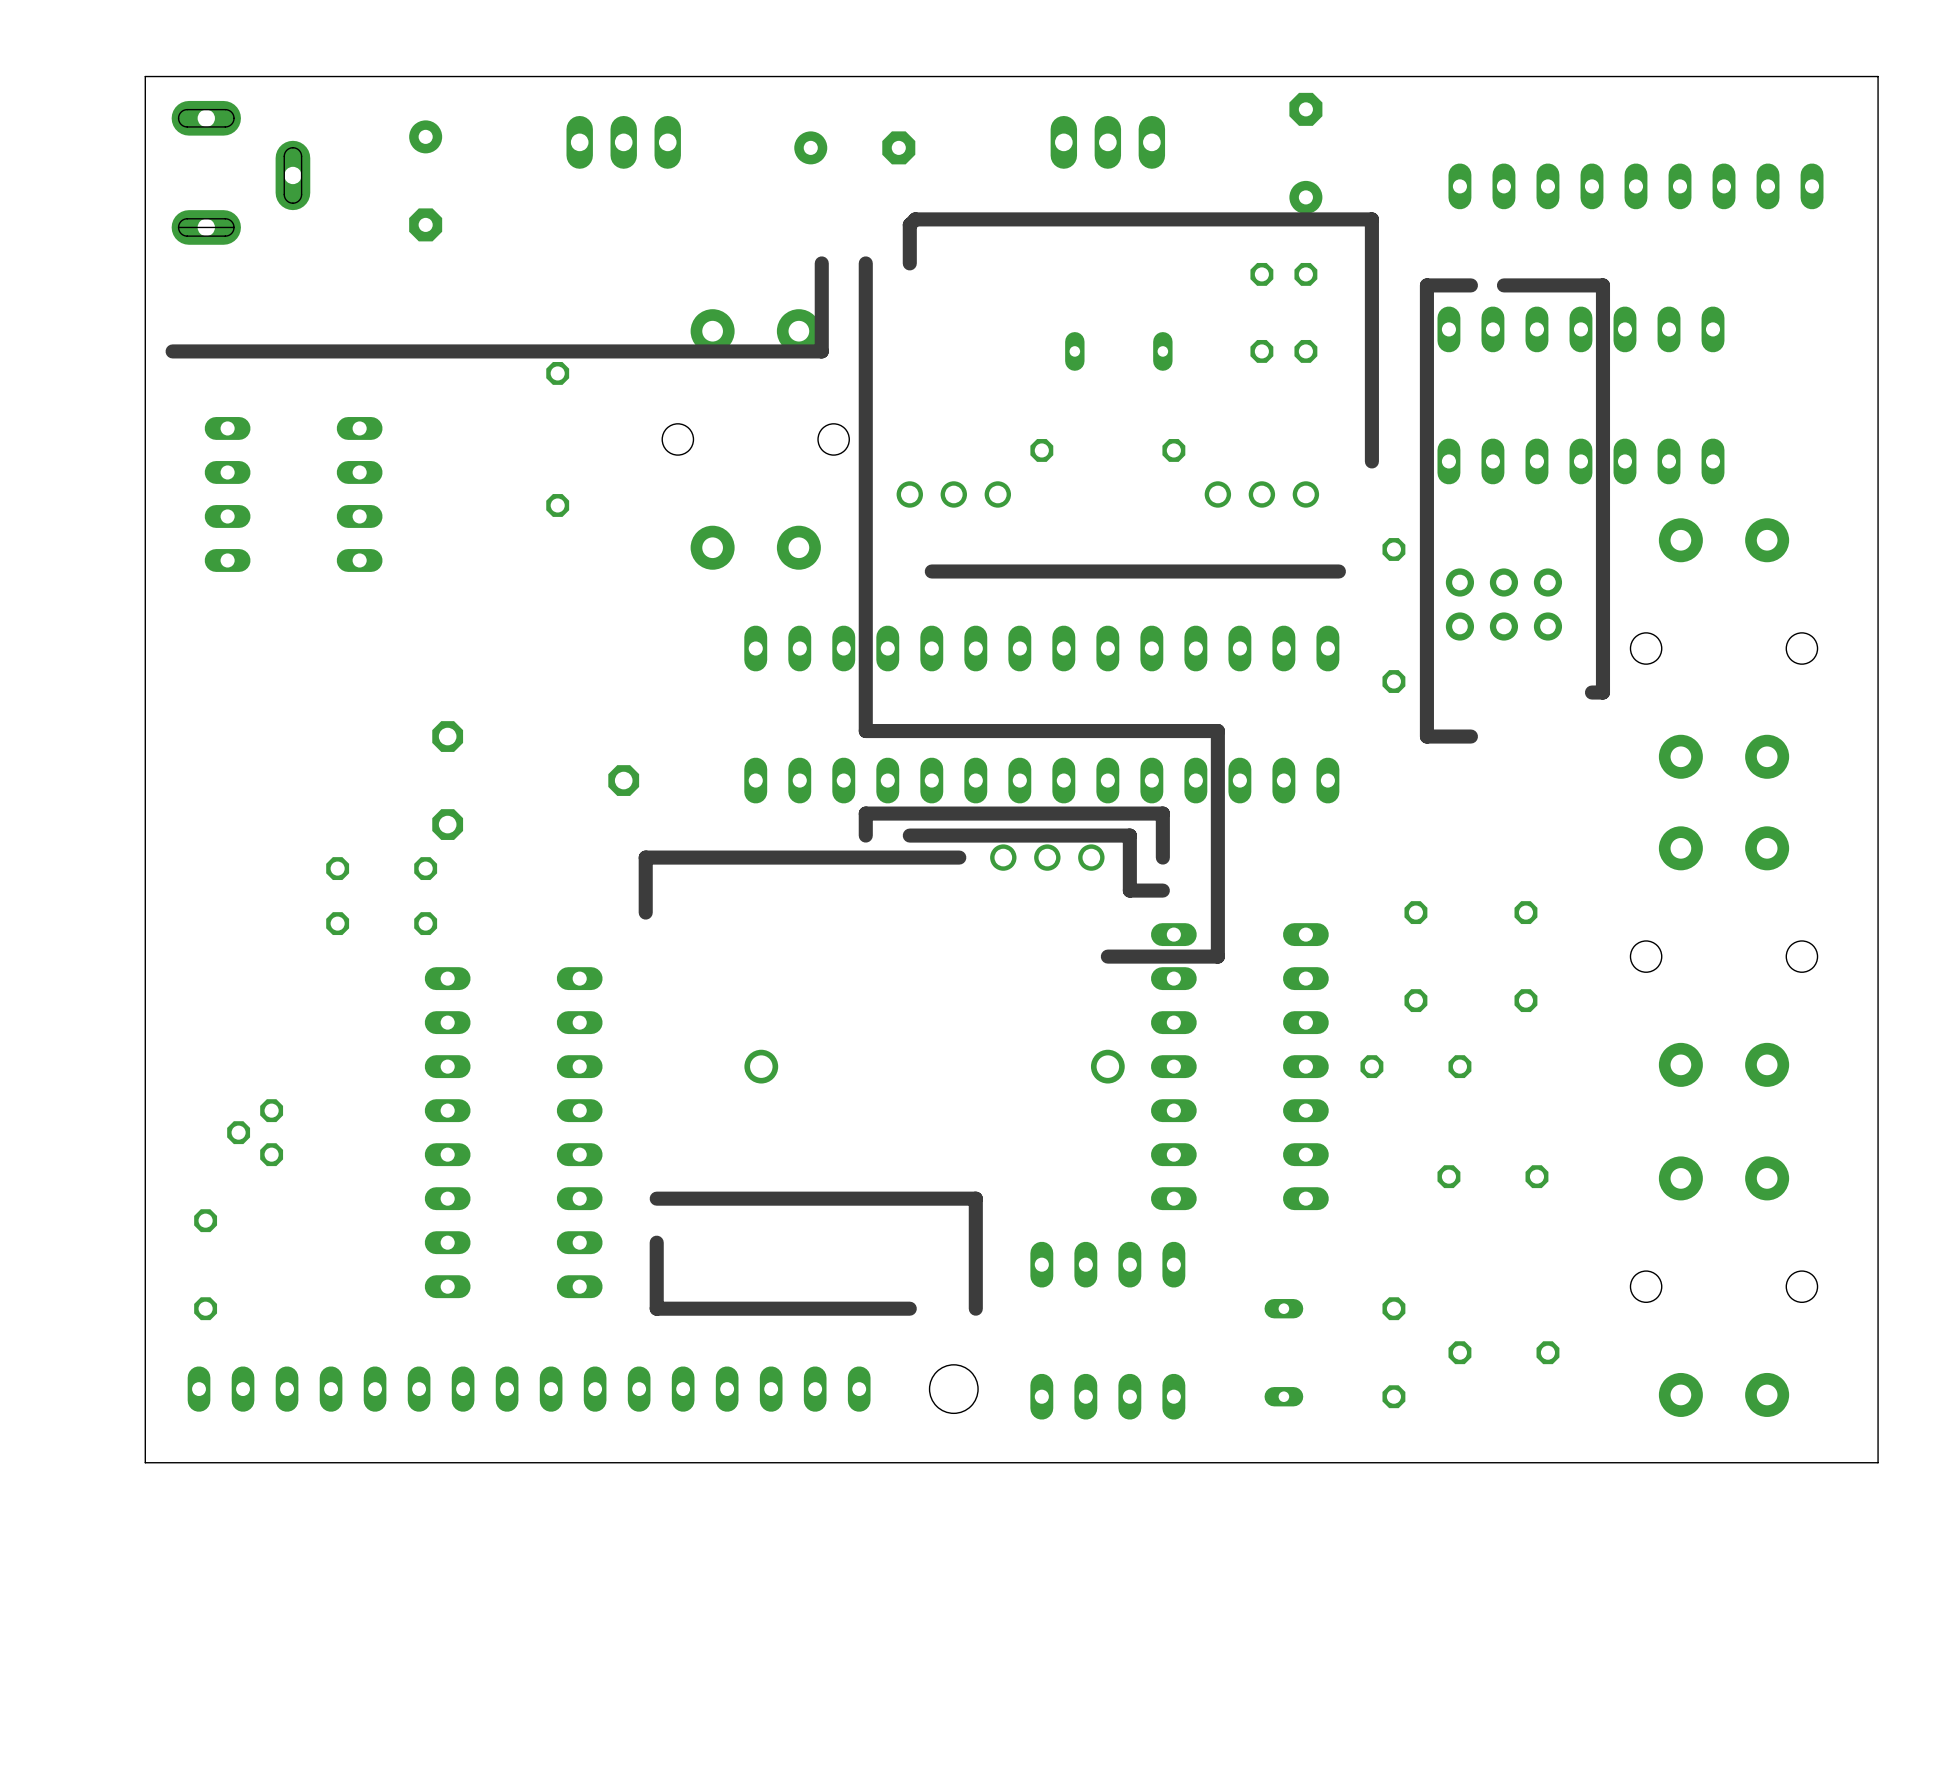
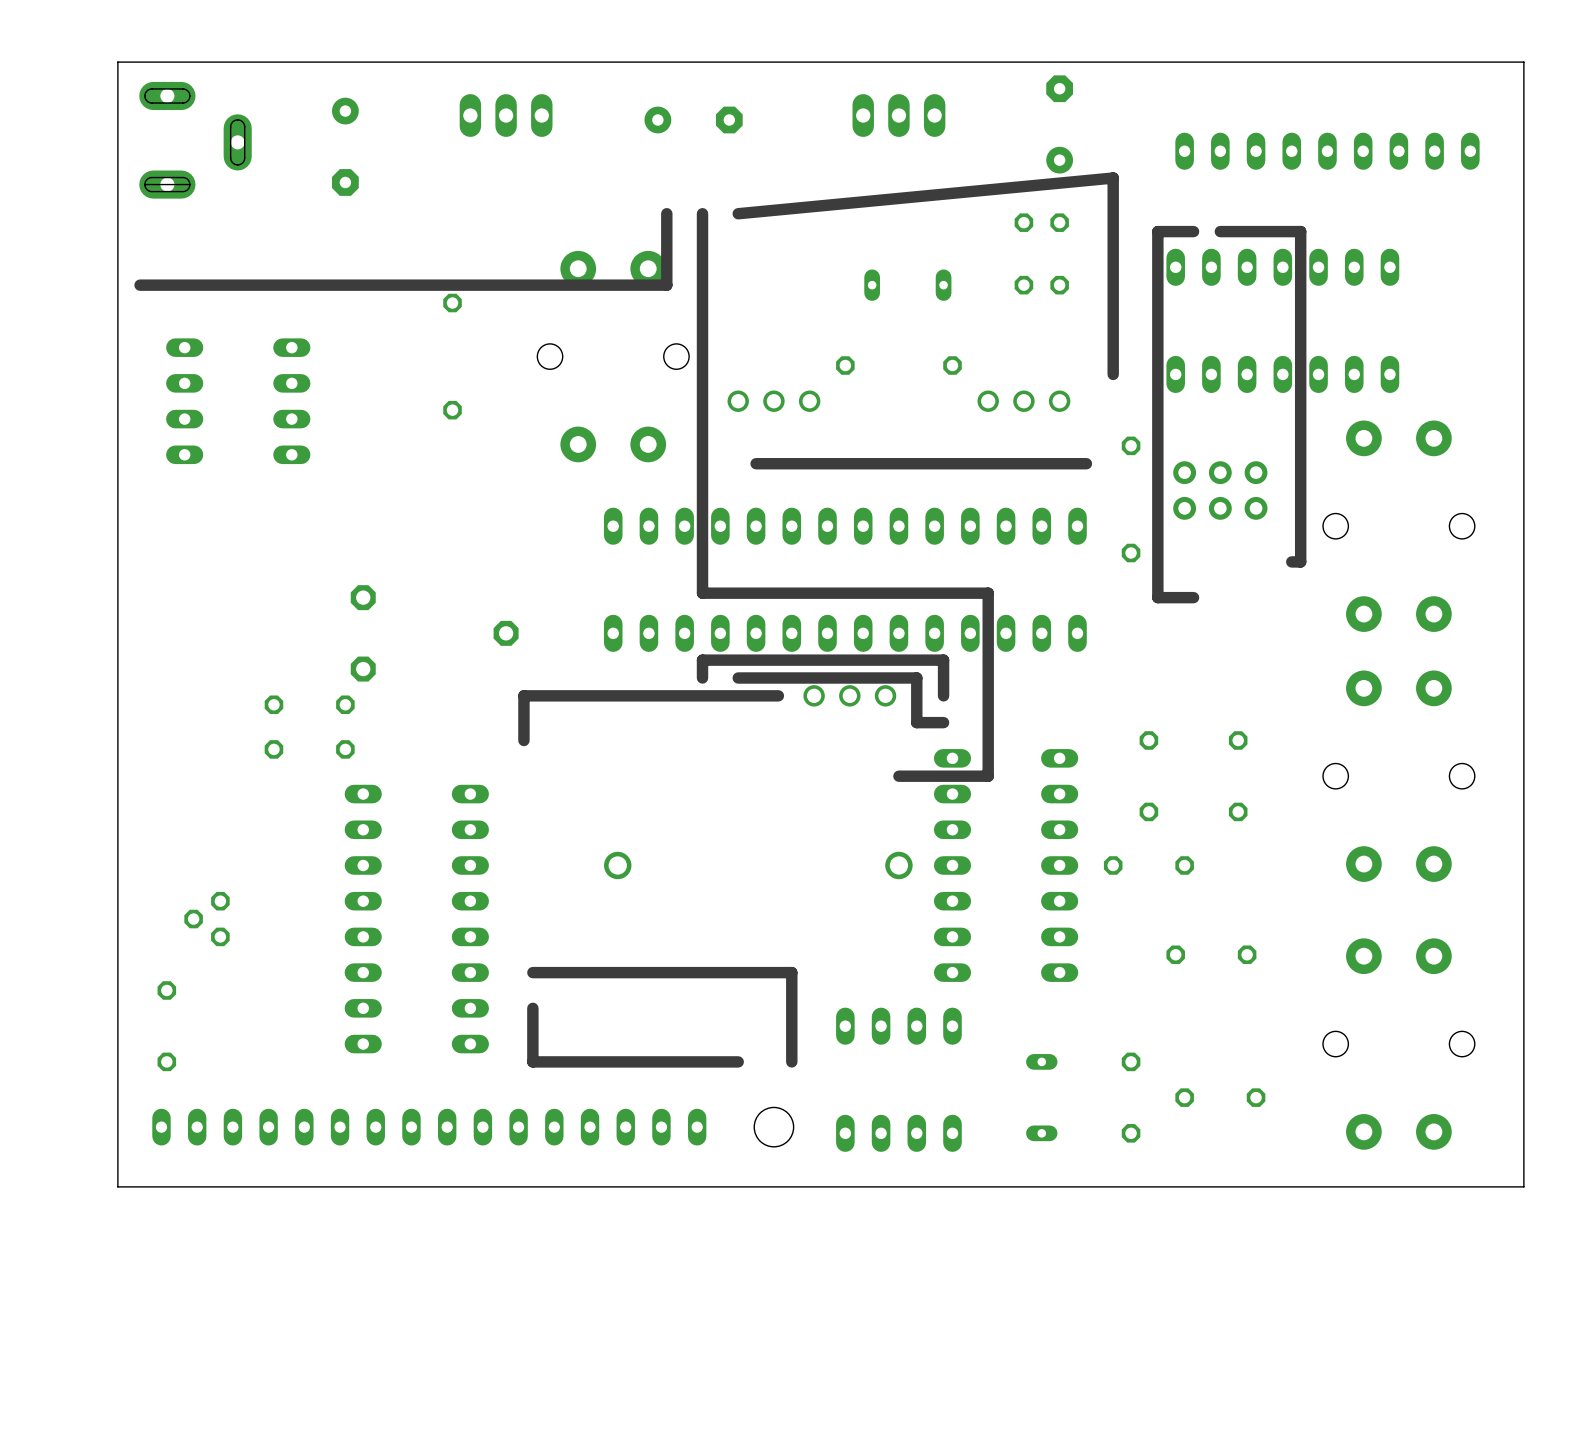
line: (1371, 219) (915, 219) (909, 224) (909, 263) -> (1113, 178) (738, 213)

